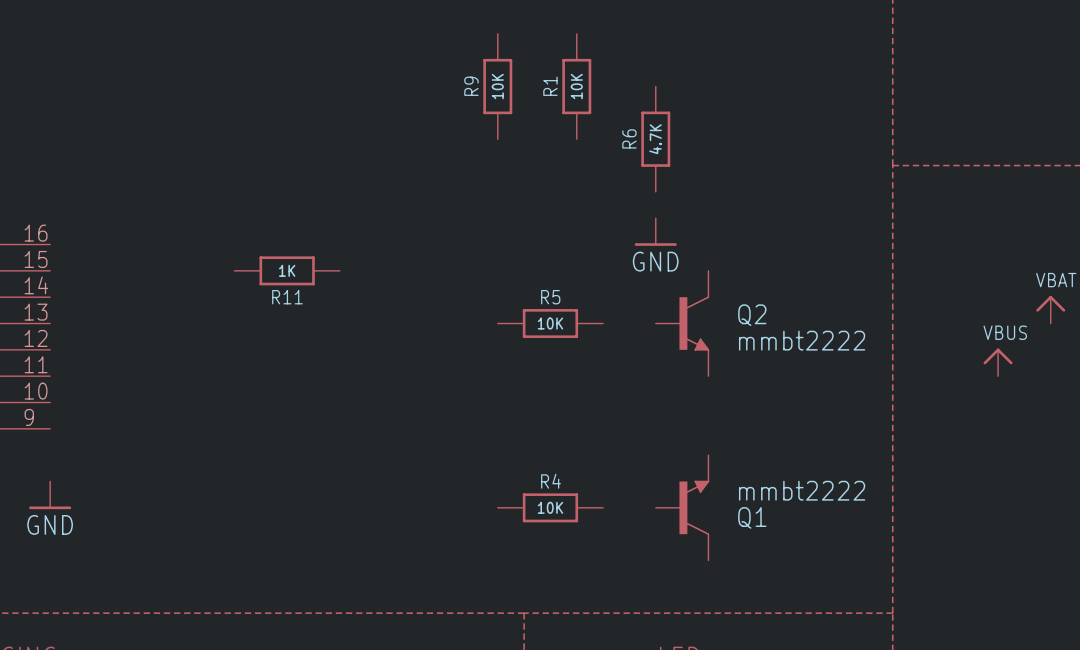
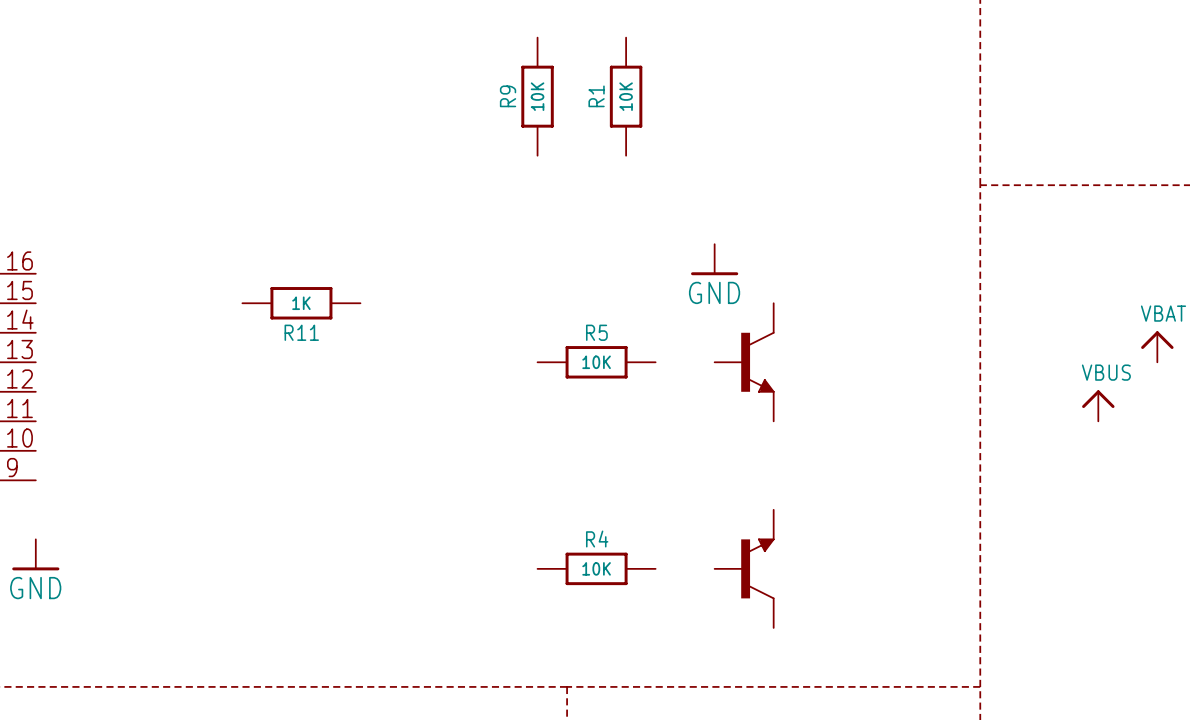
R6: 4.7K (655, 139) -> none
Q2 name: Q2 (752, 315) -> none
Q2 value: mmbt2222 (802, 340) -> none
Q1 value: mmbt2222 (802, 490) -> none
Q1 name: Q1 (752, 517) -> none

